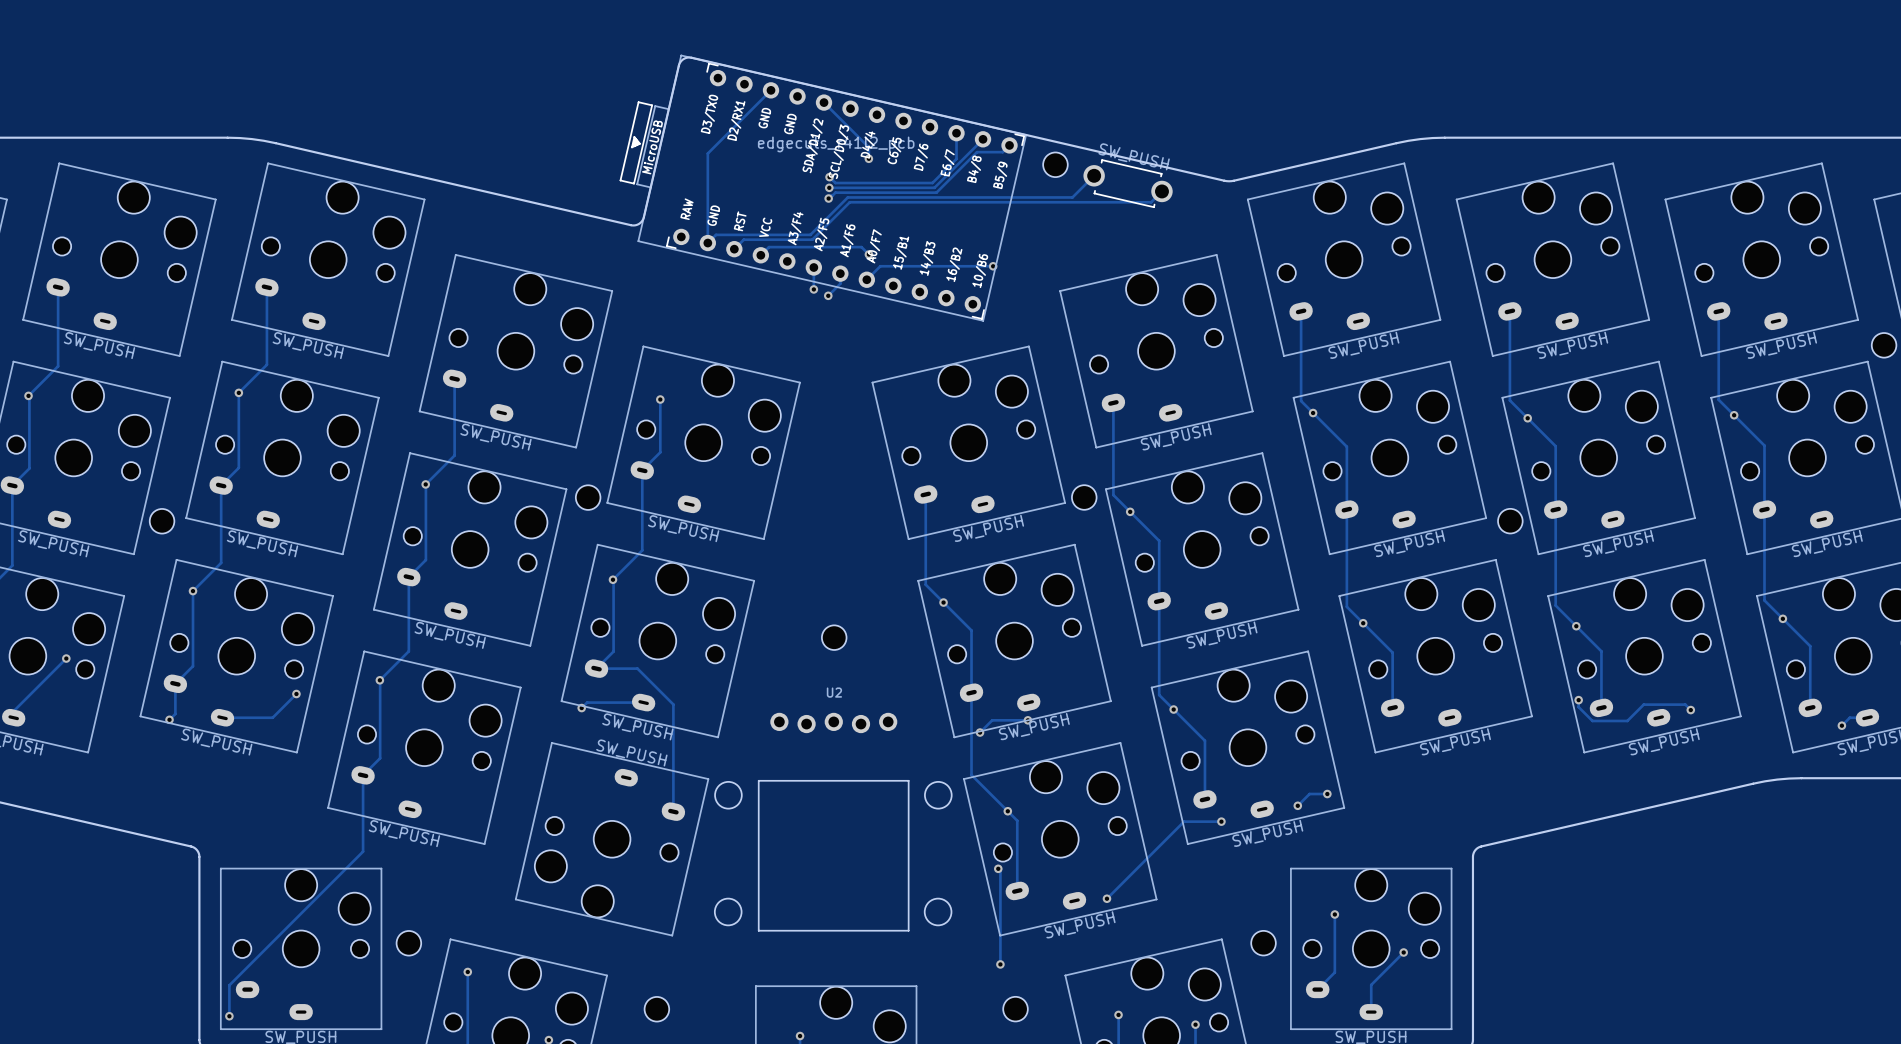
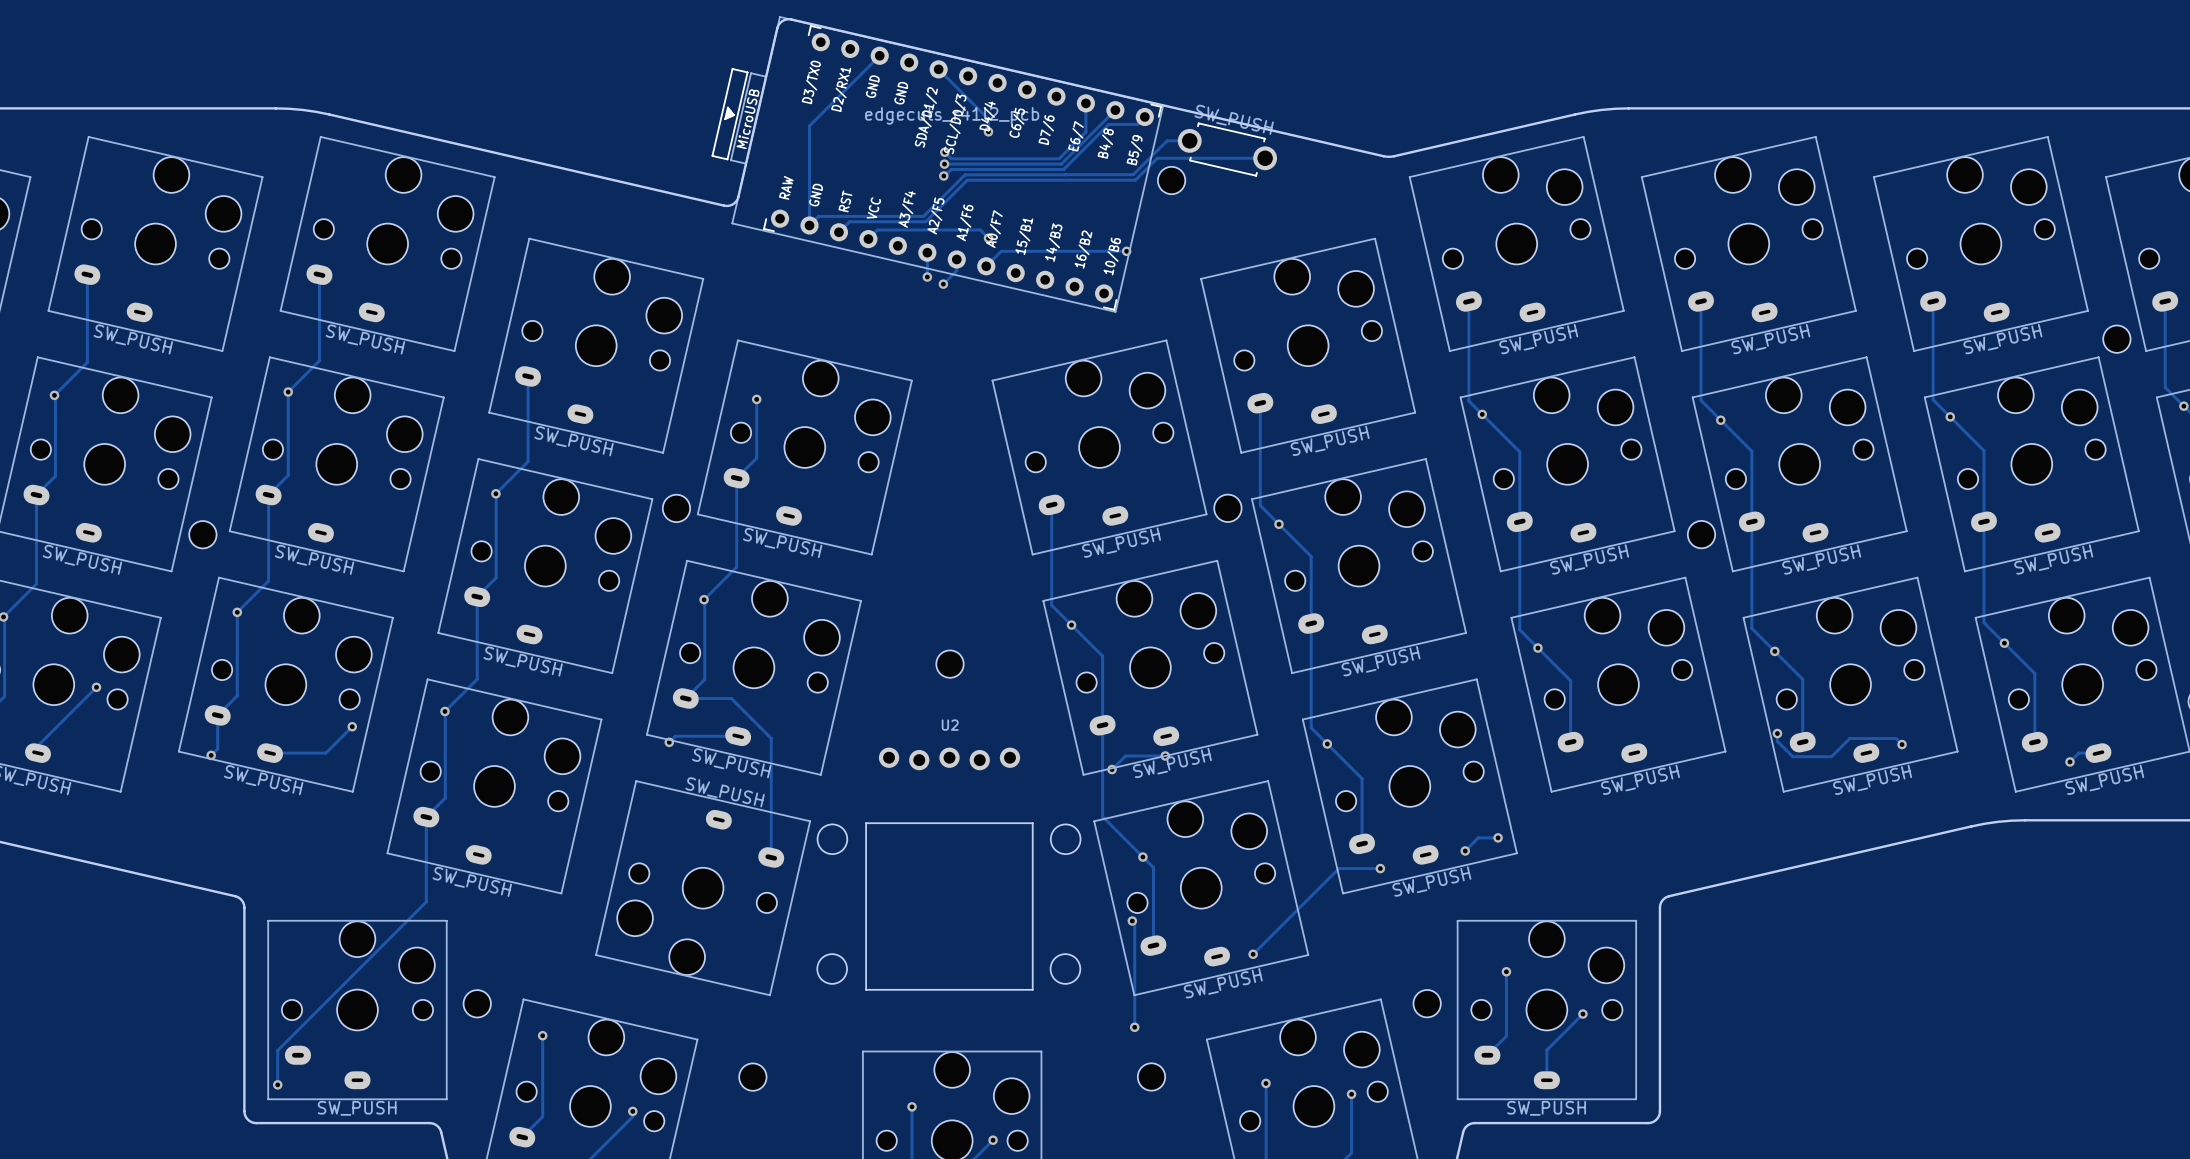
part position: (1055, 164) -> (1171, 180)
track: (1094, 175) (1072, 197) (938, 197) -> (1189, 140) (1167, 140) (1133, 174) (1066, 174)
part position: (1128, 183) -> (1227, 149)
track: (1161, 191) (1151, 202) (1000, 202) -> (1265, 158) (1157, 158) (1135, 180)

